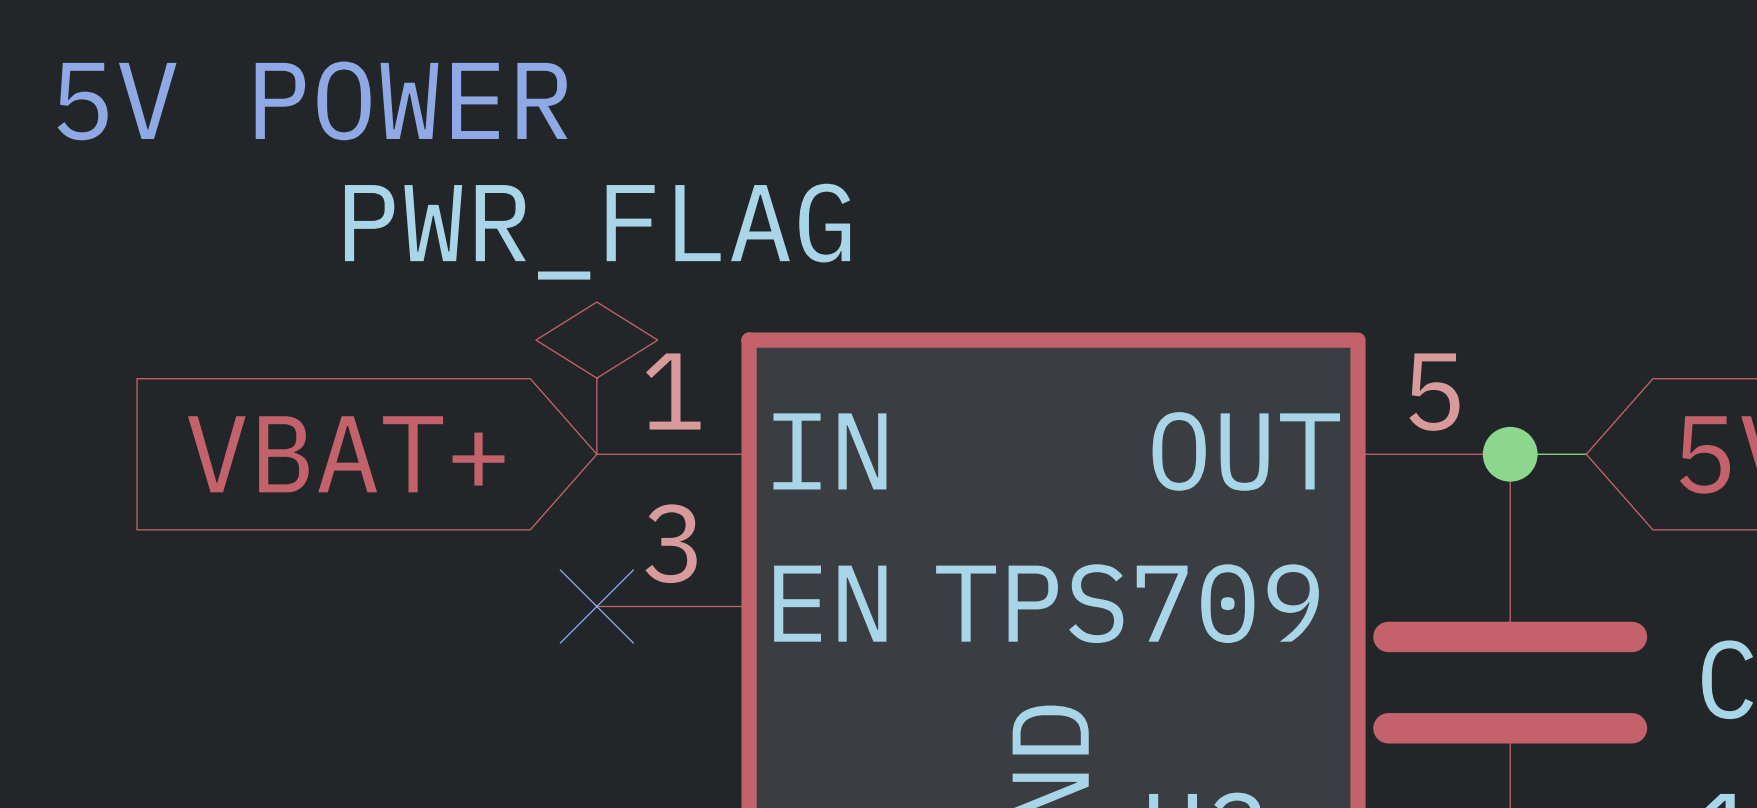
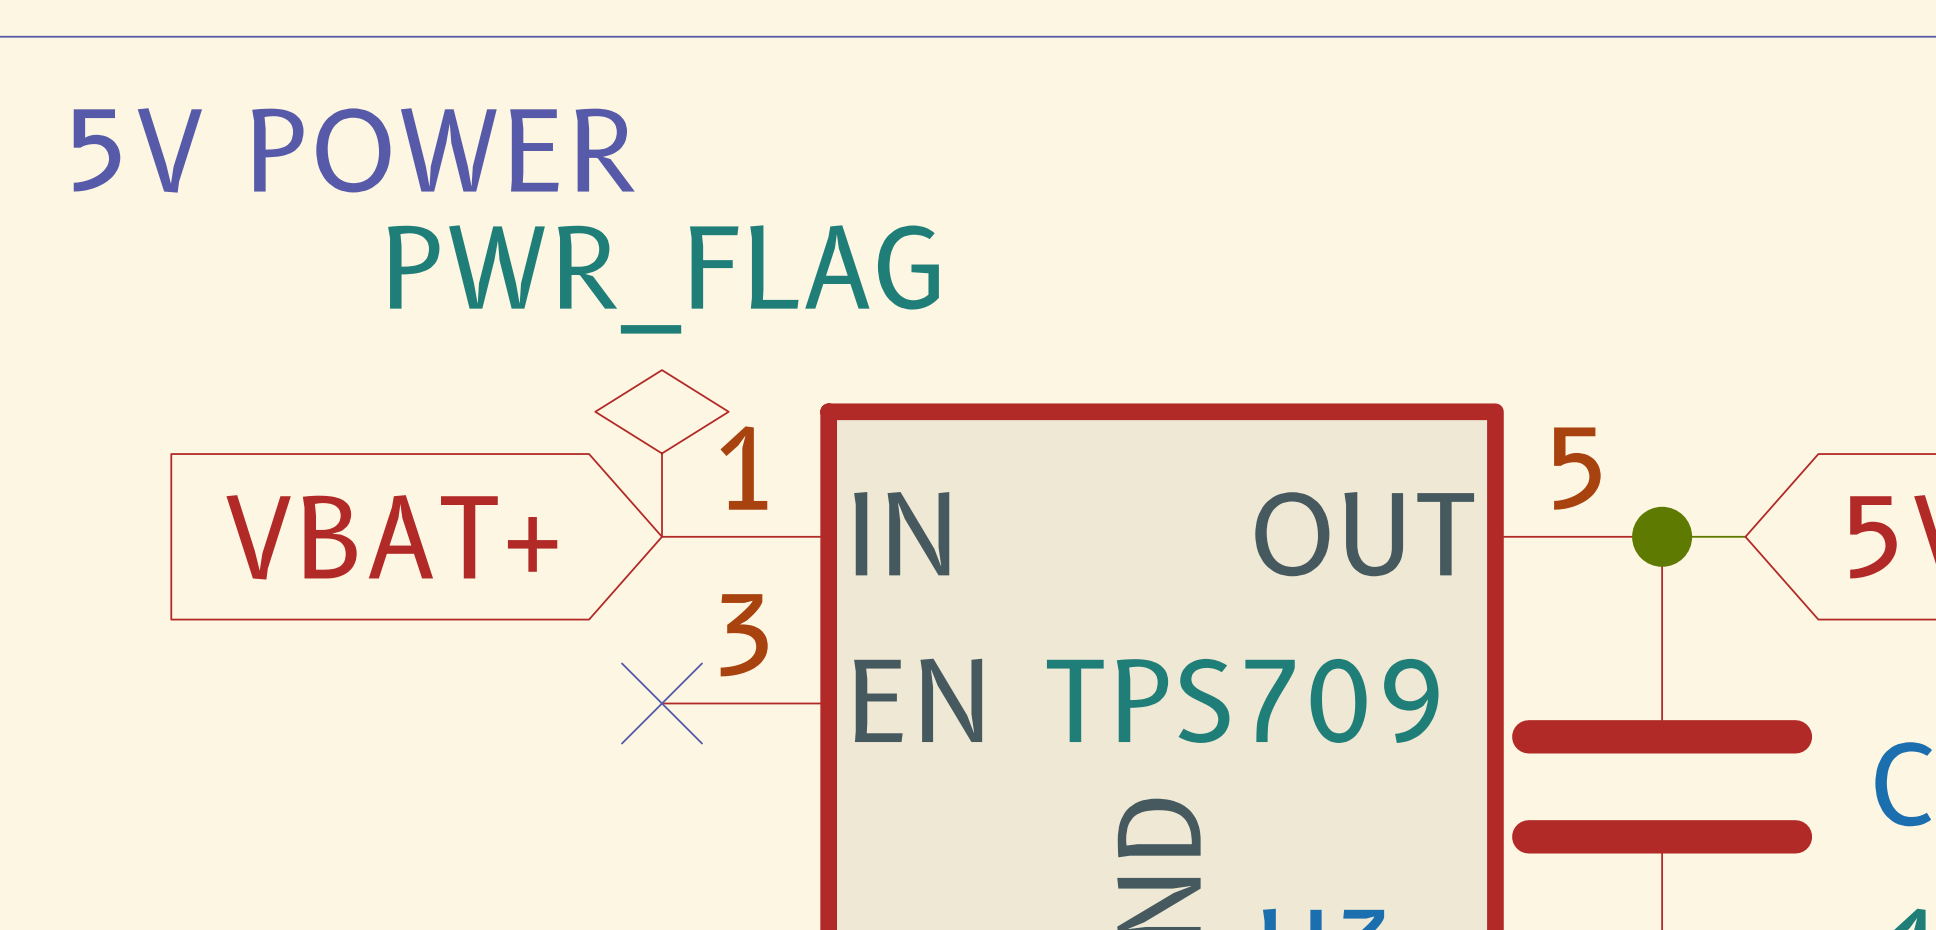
power symbol text position: PWR_FLAG (597, 231) -> PWR_FLAG (663, 279)

